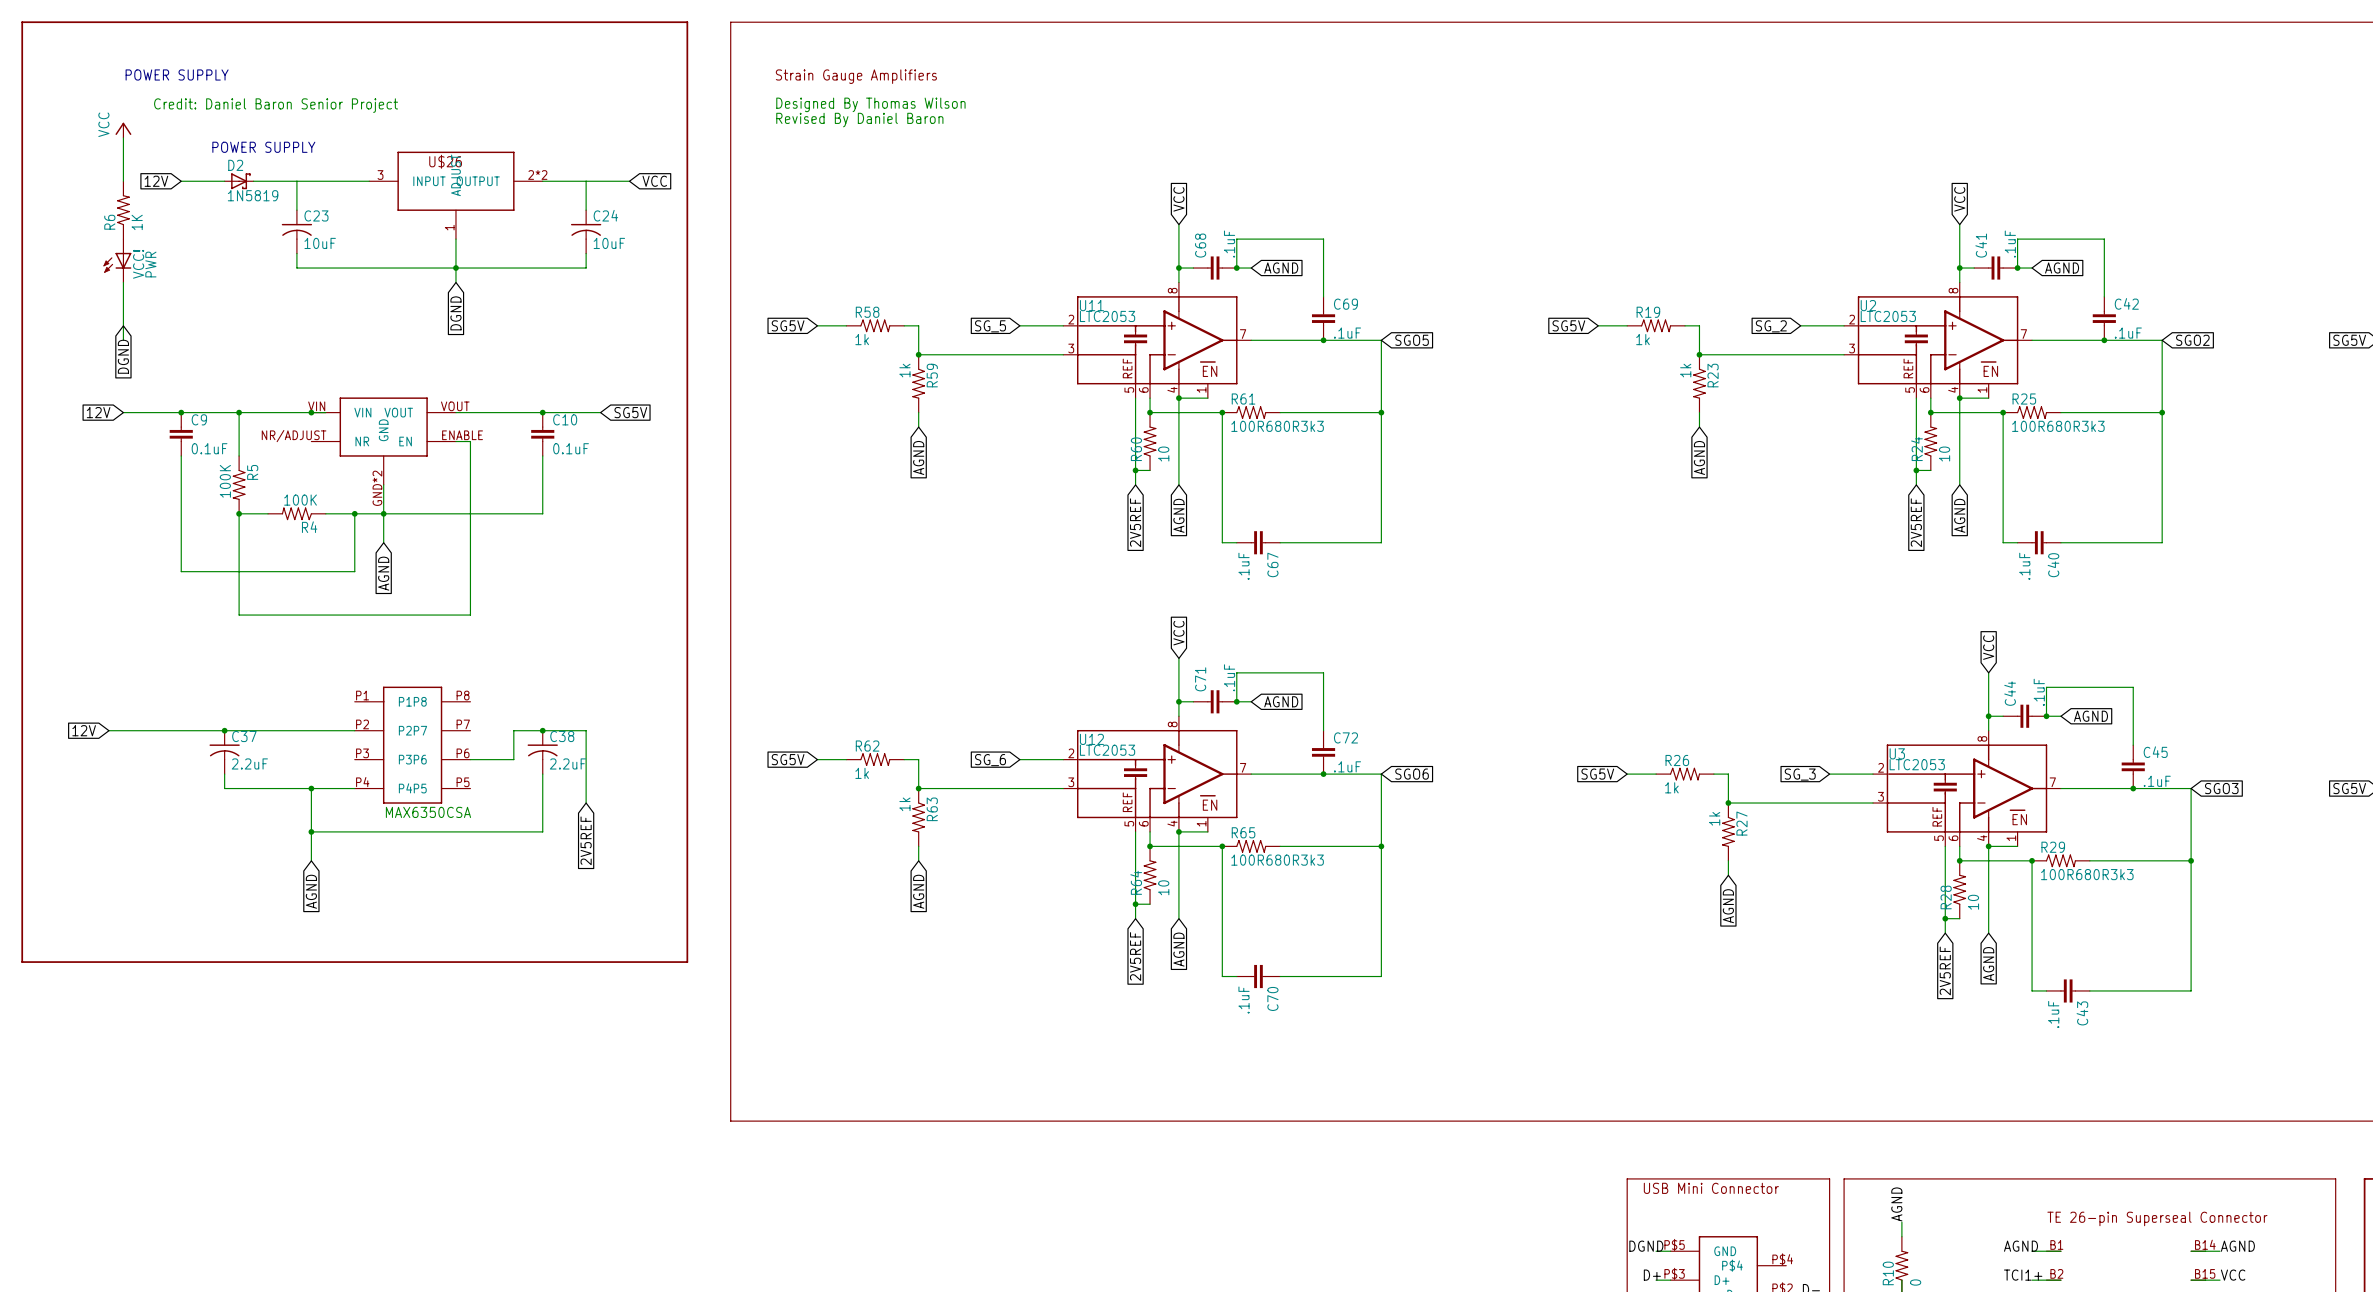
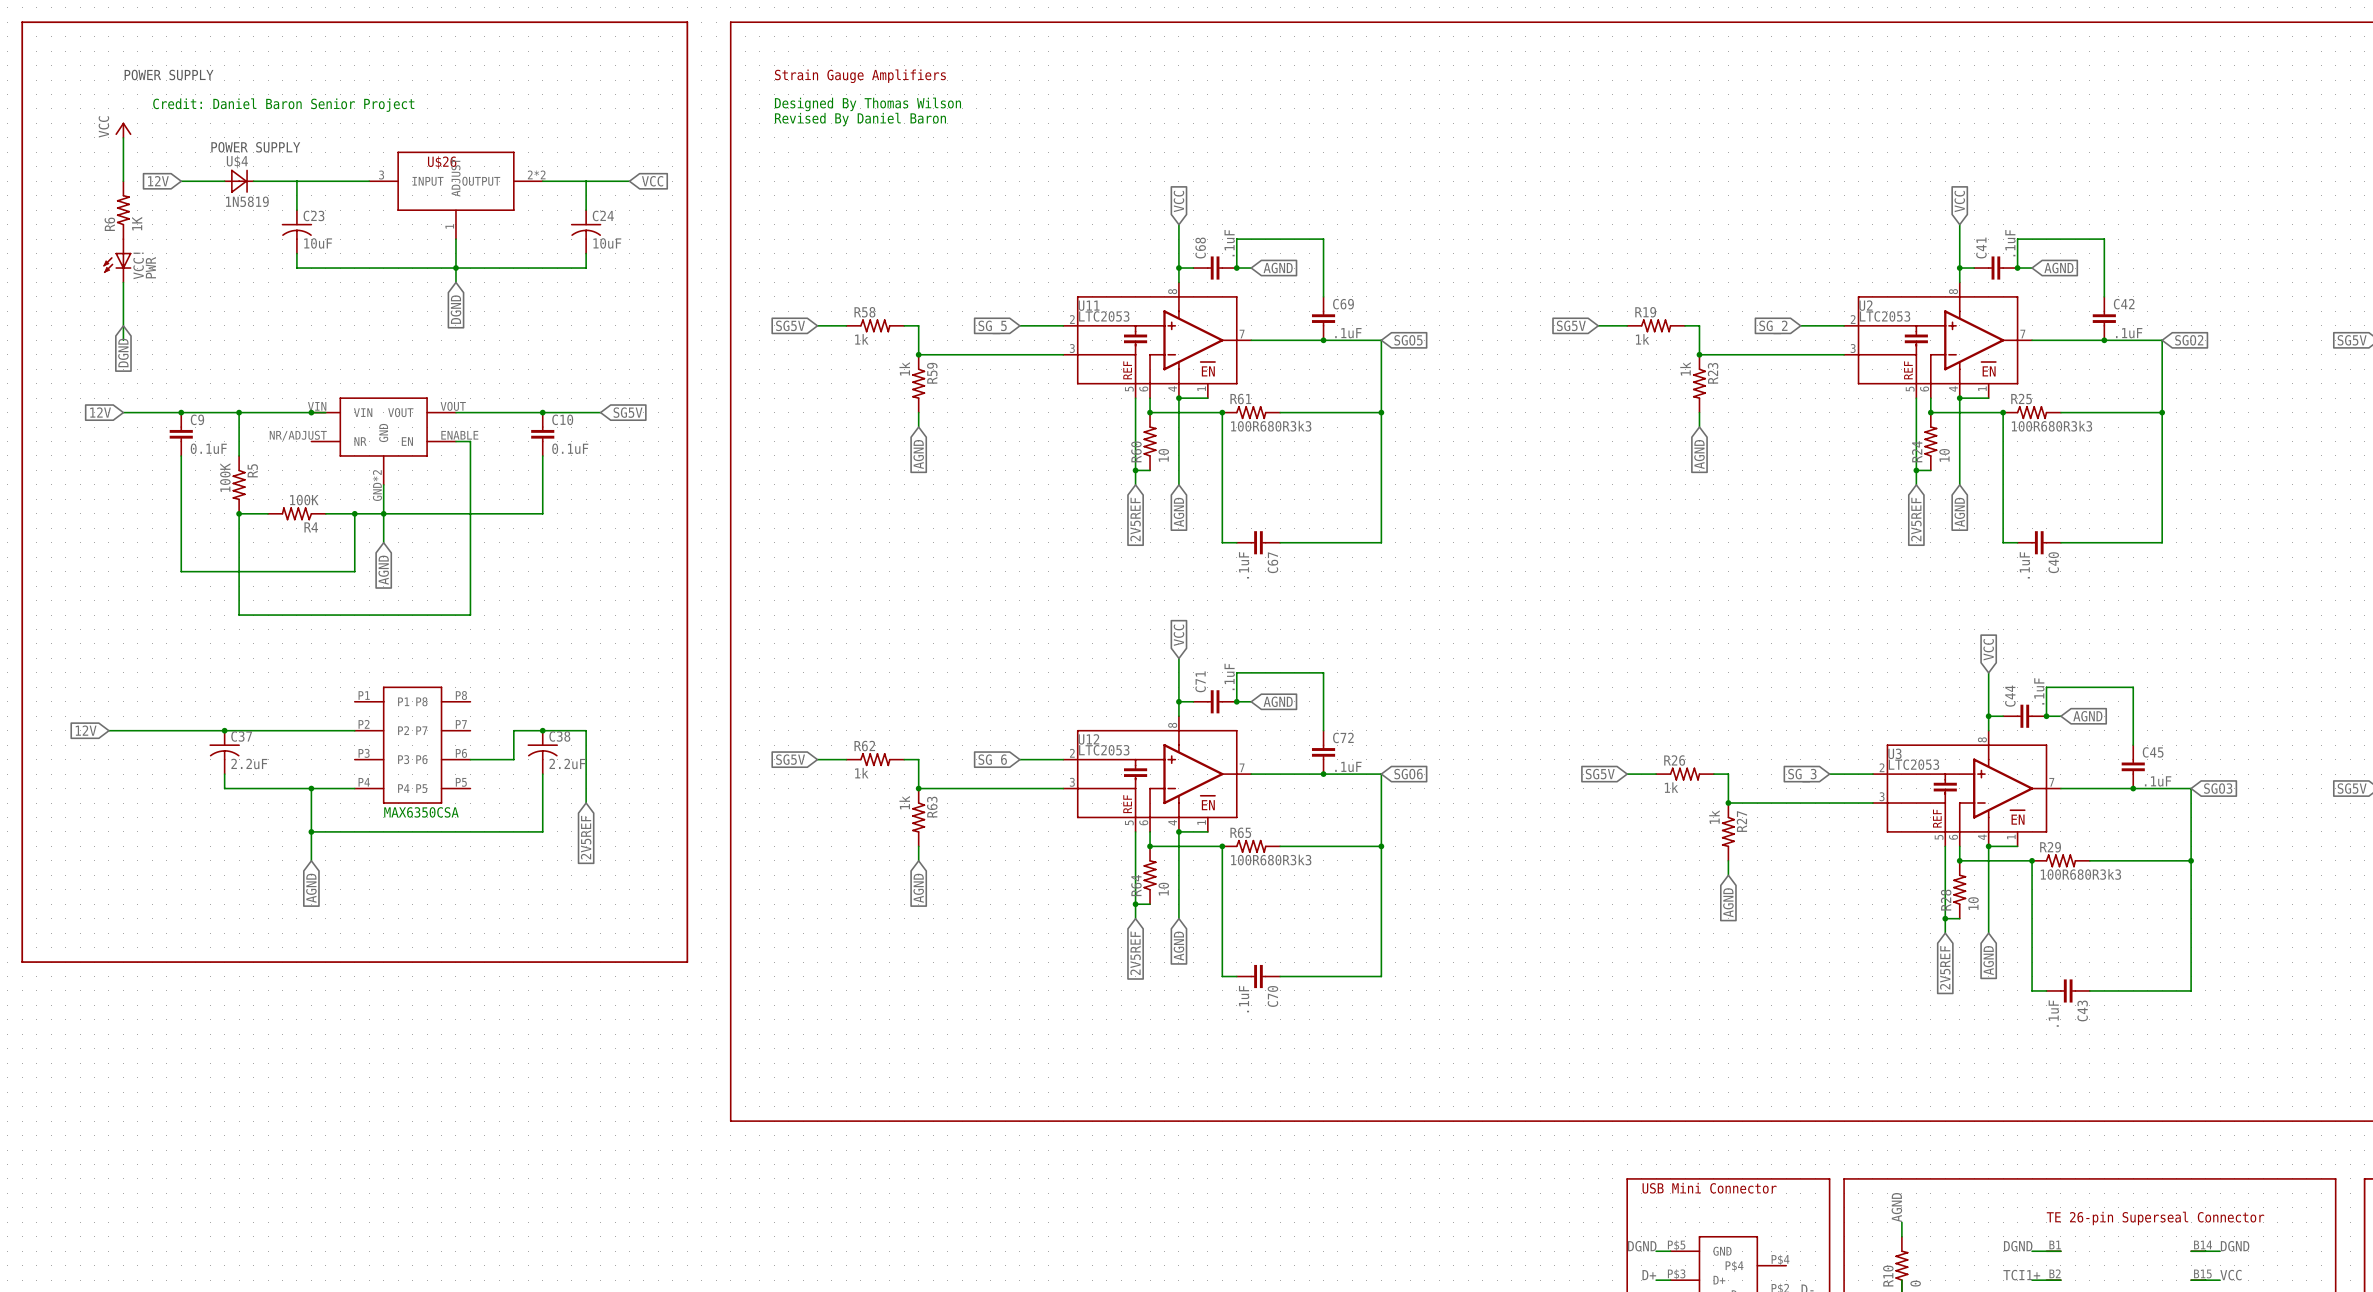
D2: 1N5819 (239, 181) -> none
U$4: none -> 1N5819 (239, 181)
label: AGND (2021, 1246) -> DGND (2018, 1246)
label: AGND (2237, 1246) -> DGND (2235, 1246)

